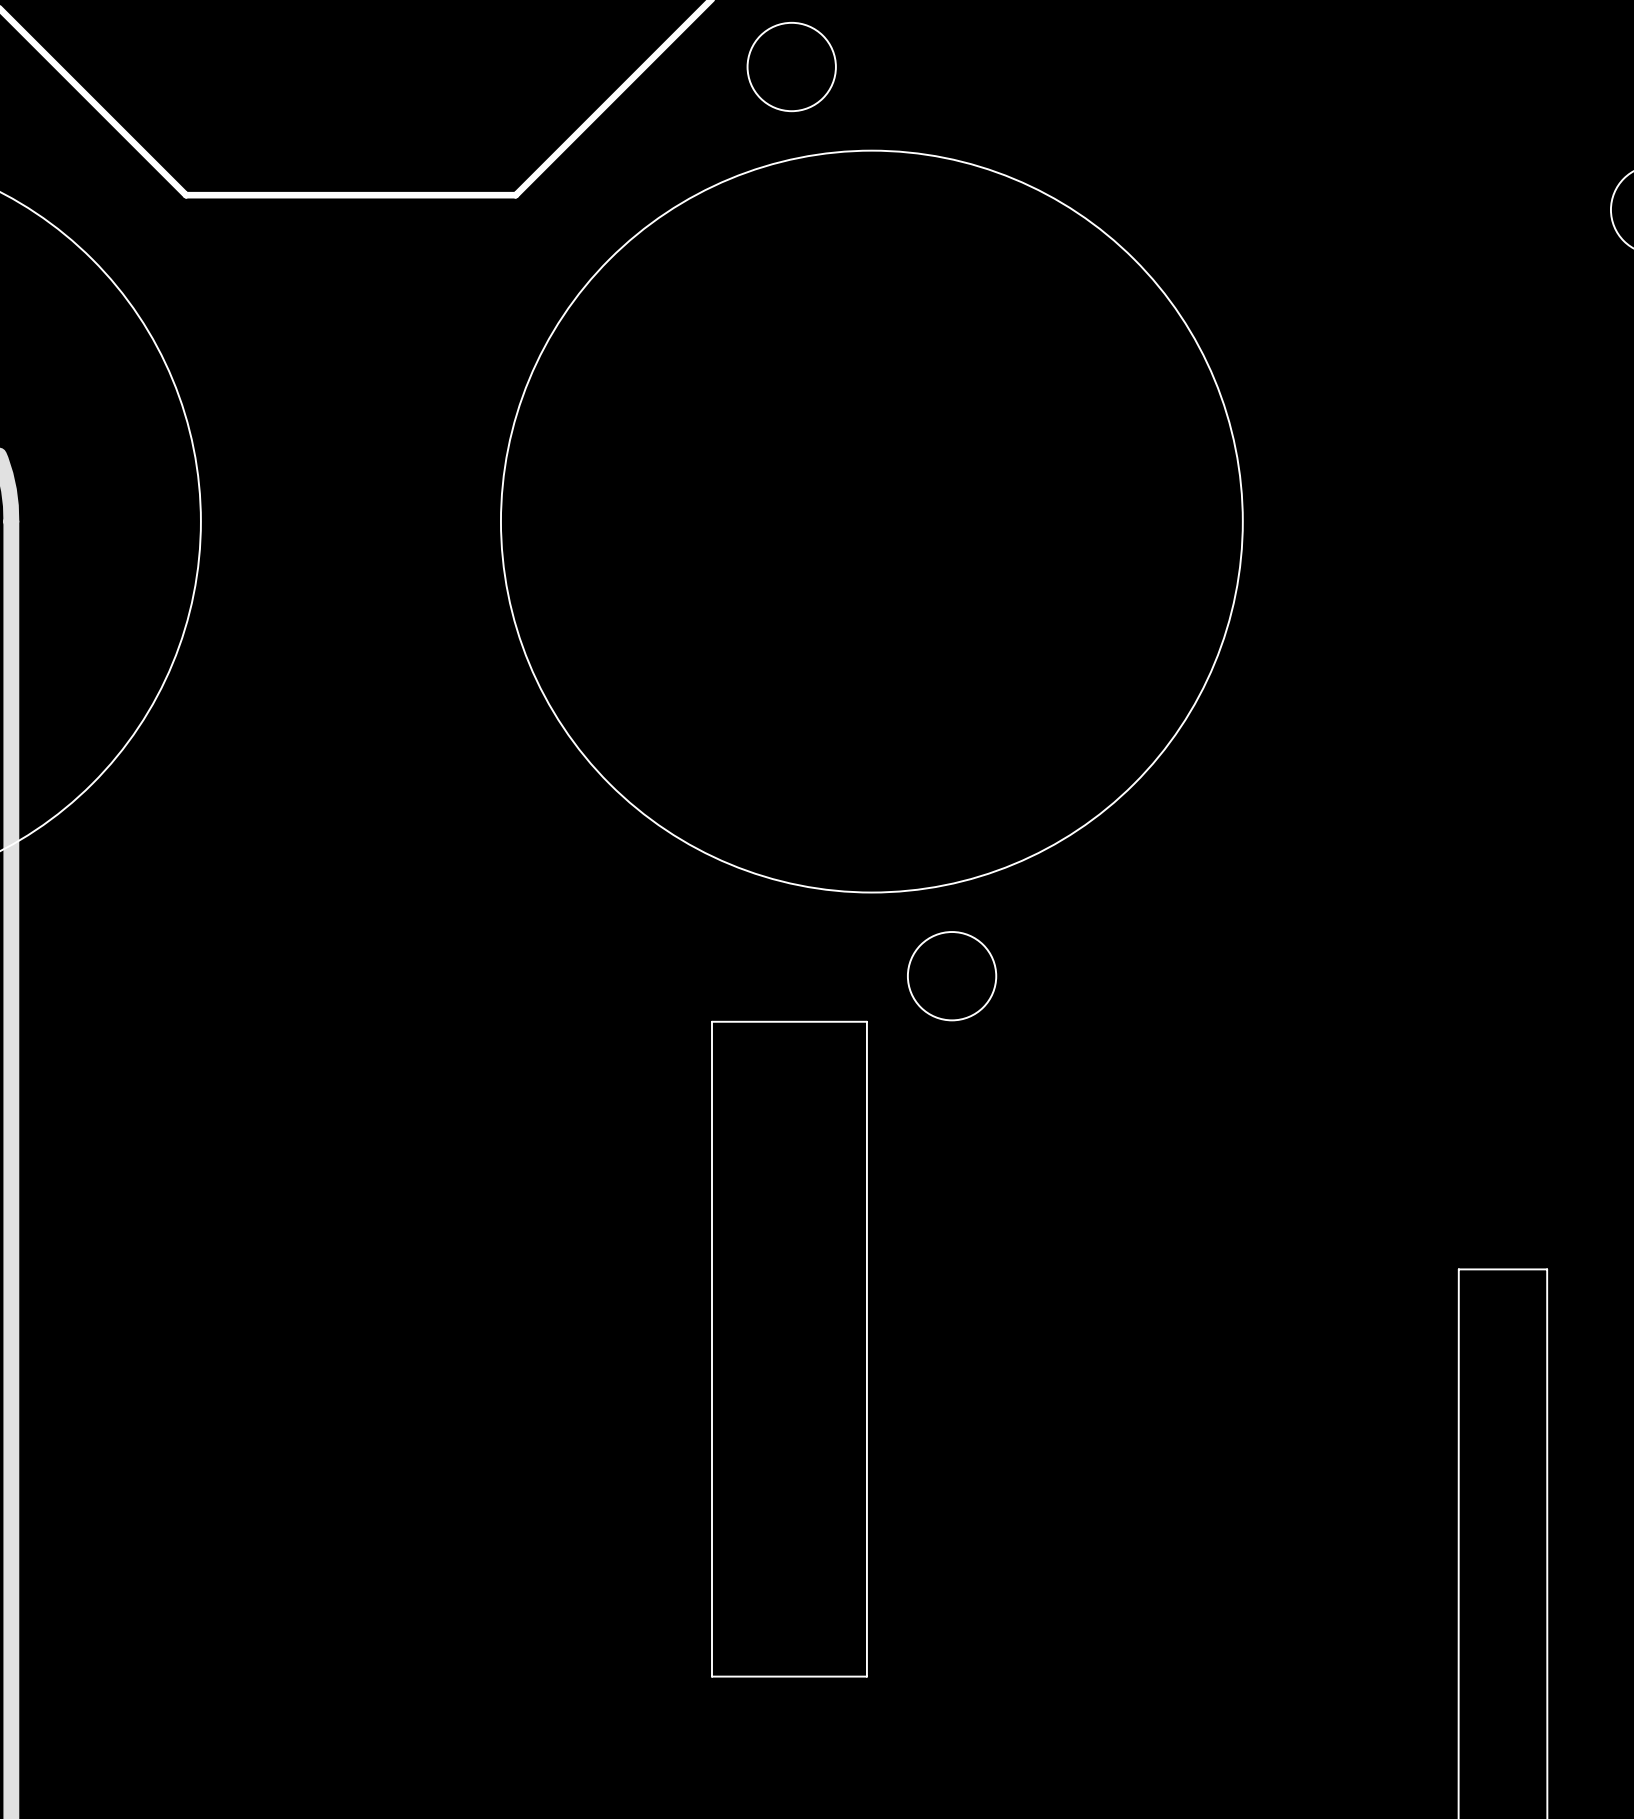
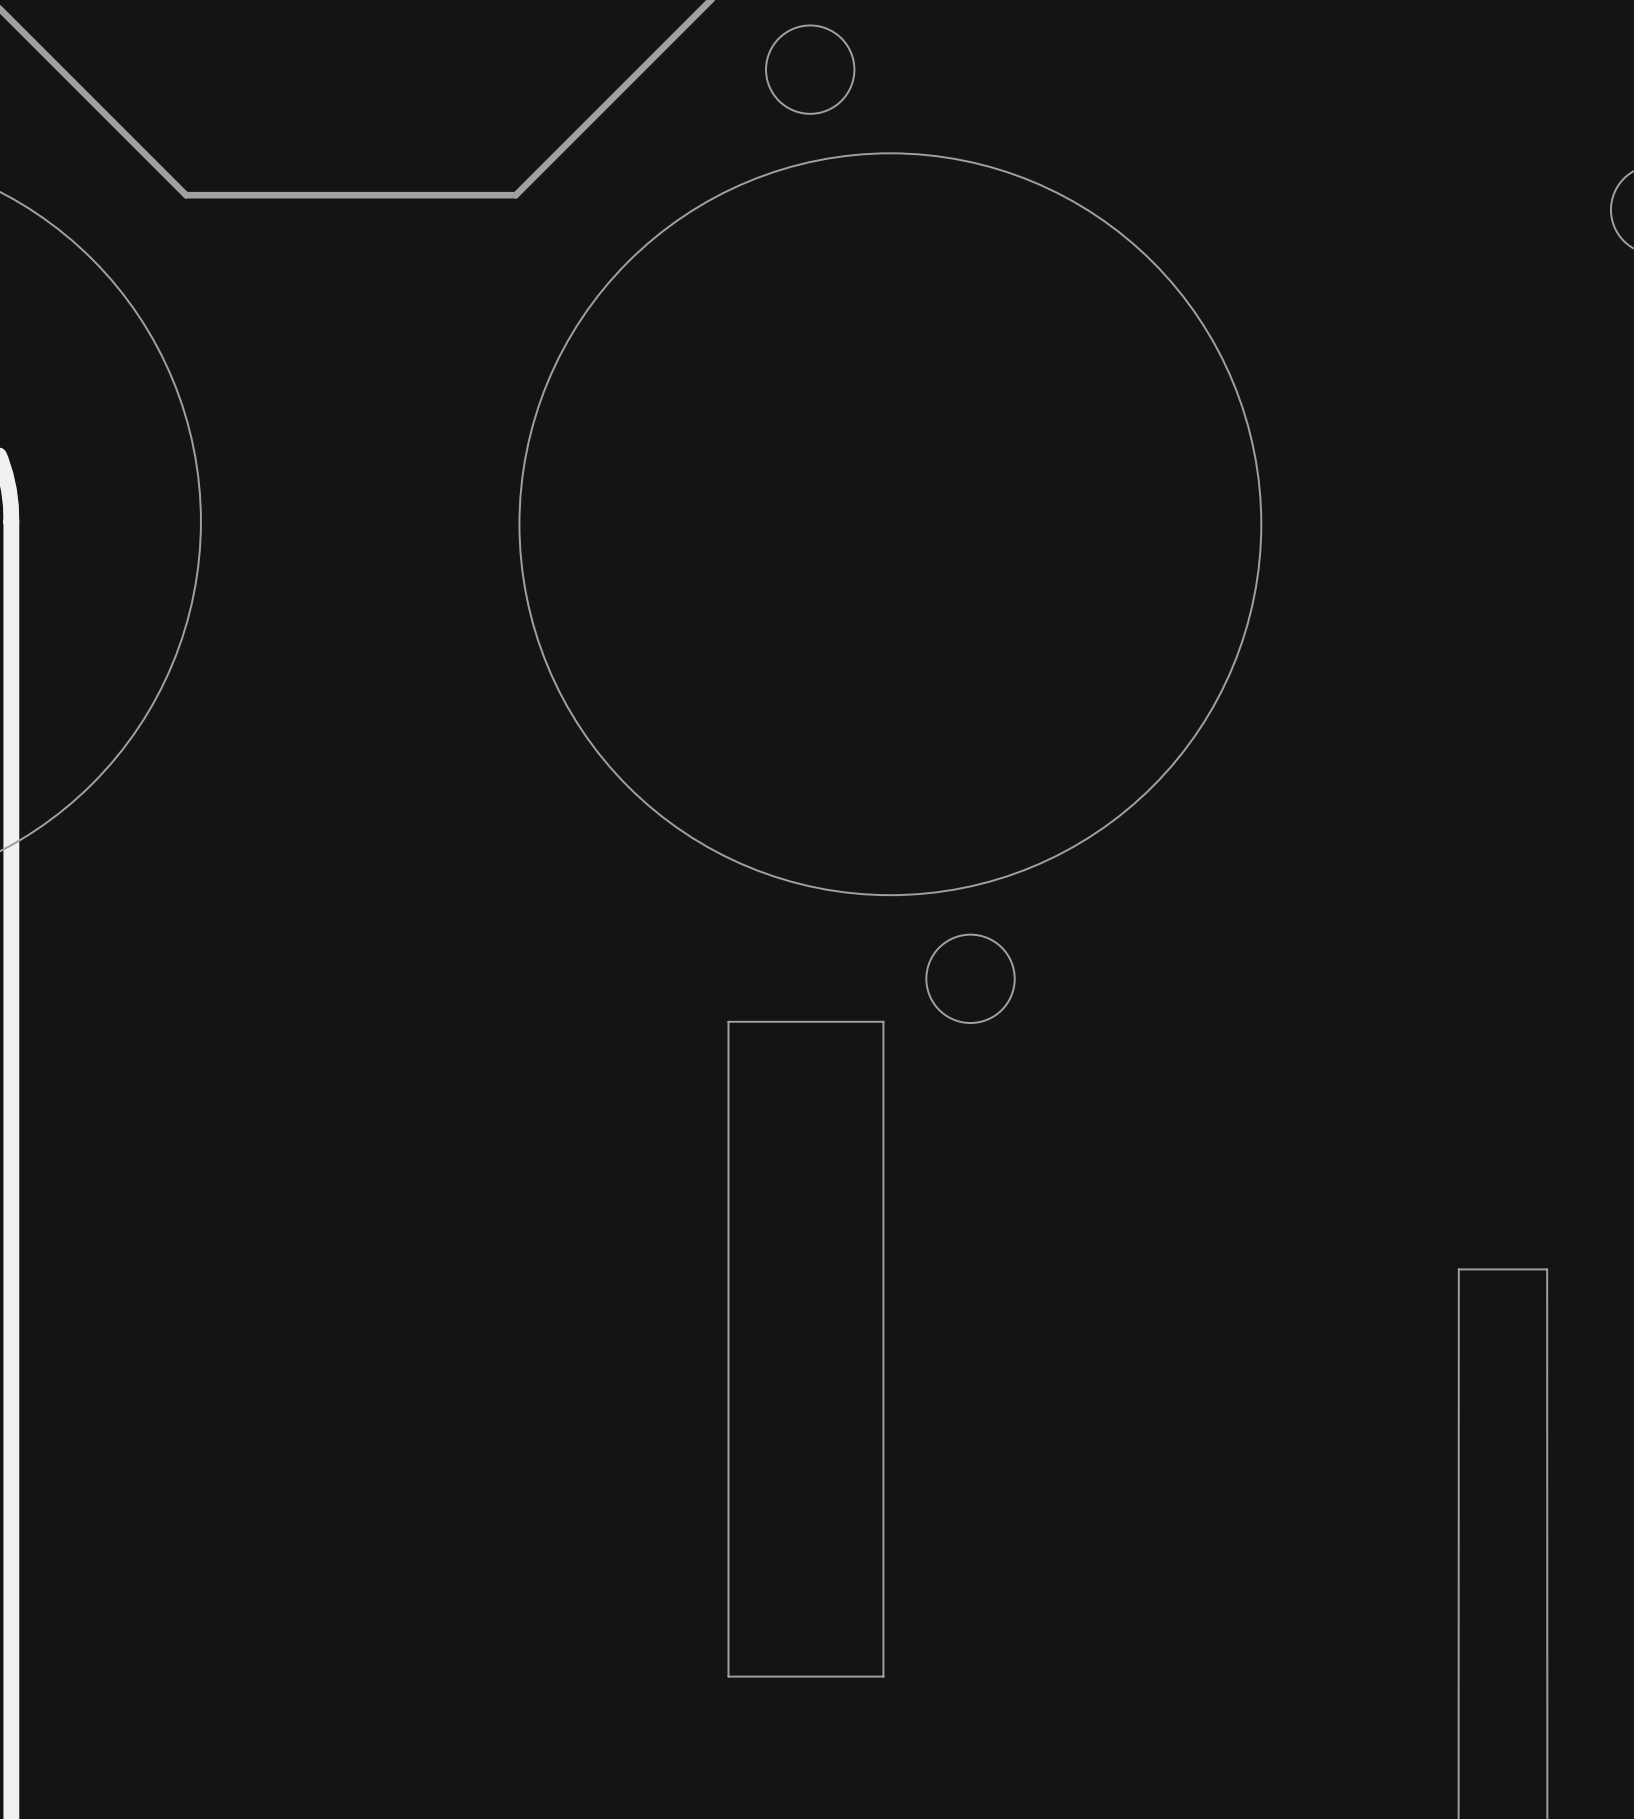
drawing position: (871, 521) -> (890, 524)
drawing position: (789, 1349) -> (805, 1349)

